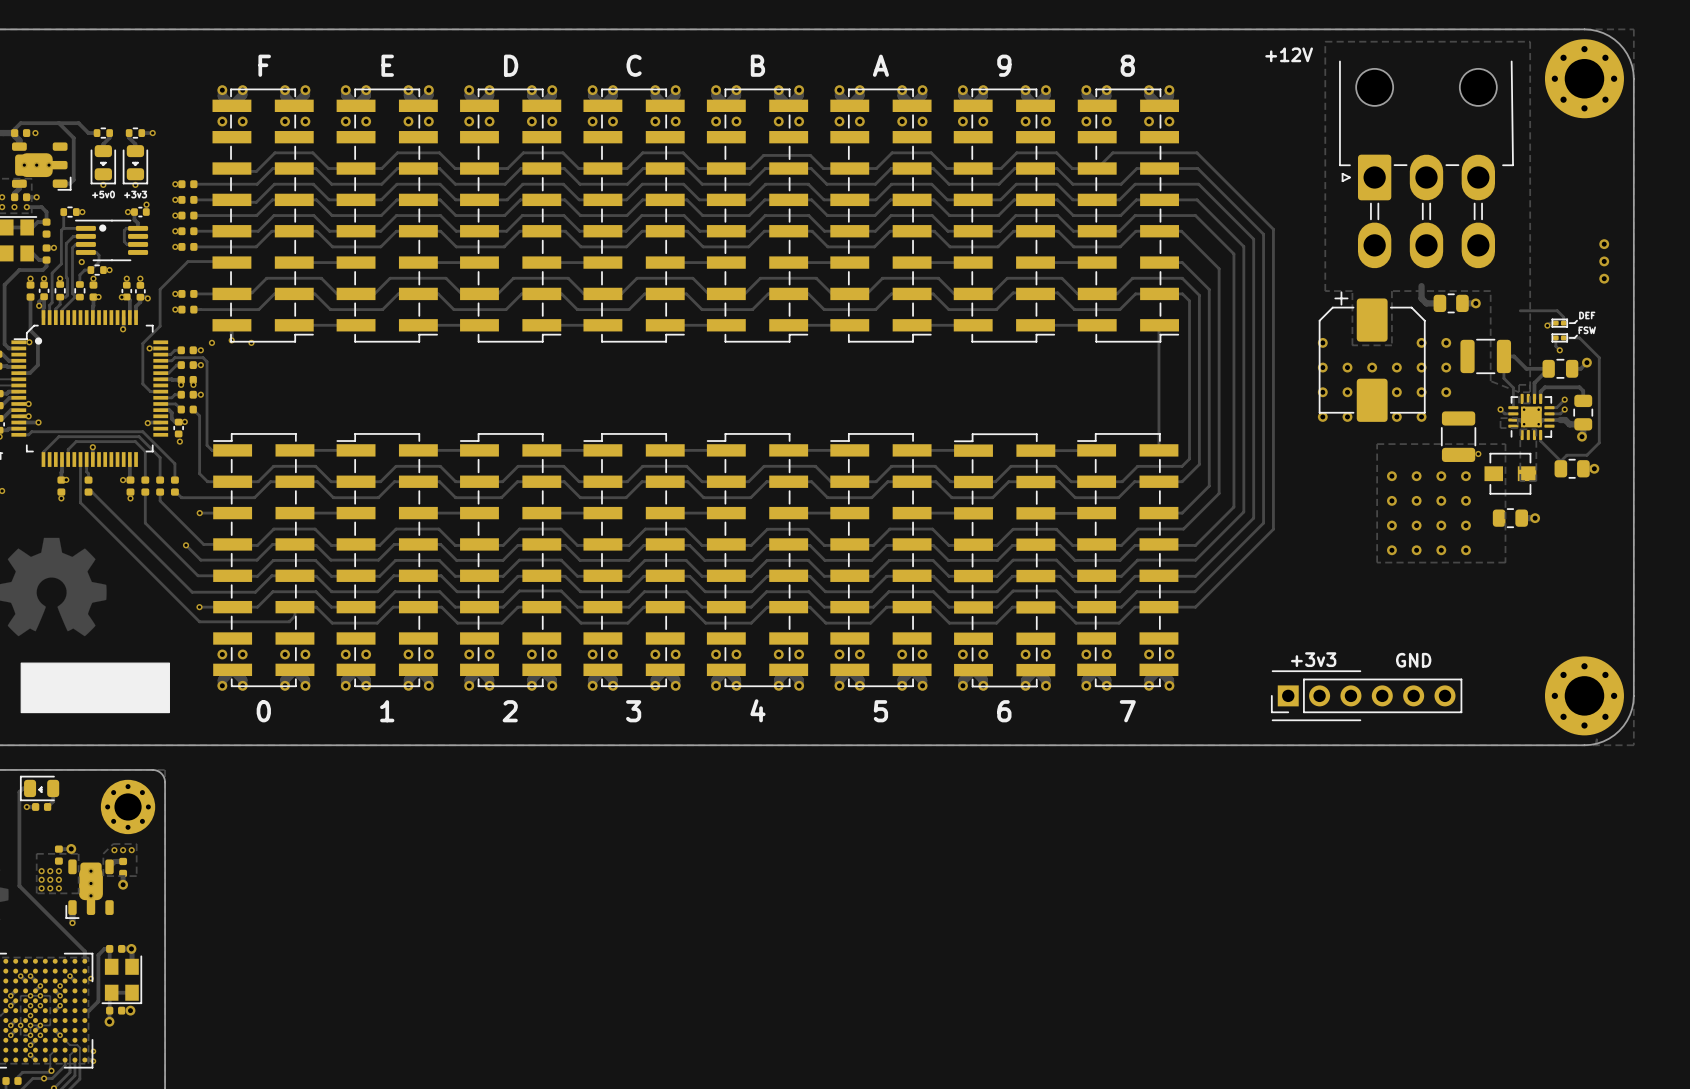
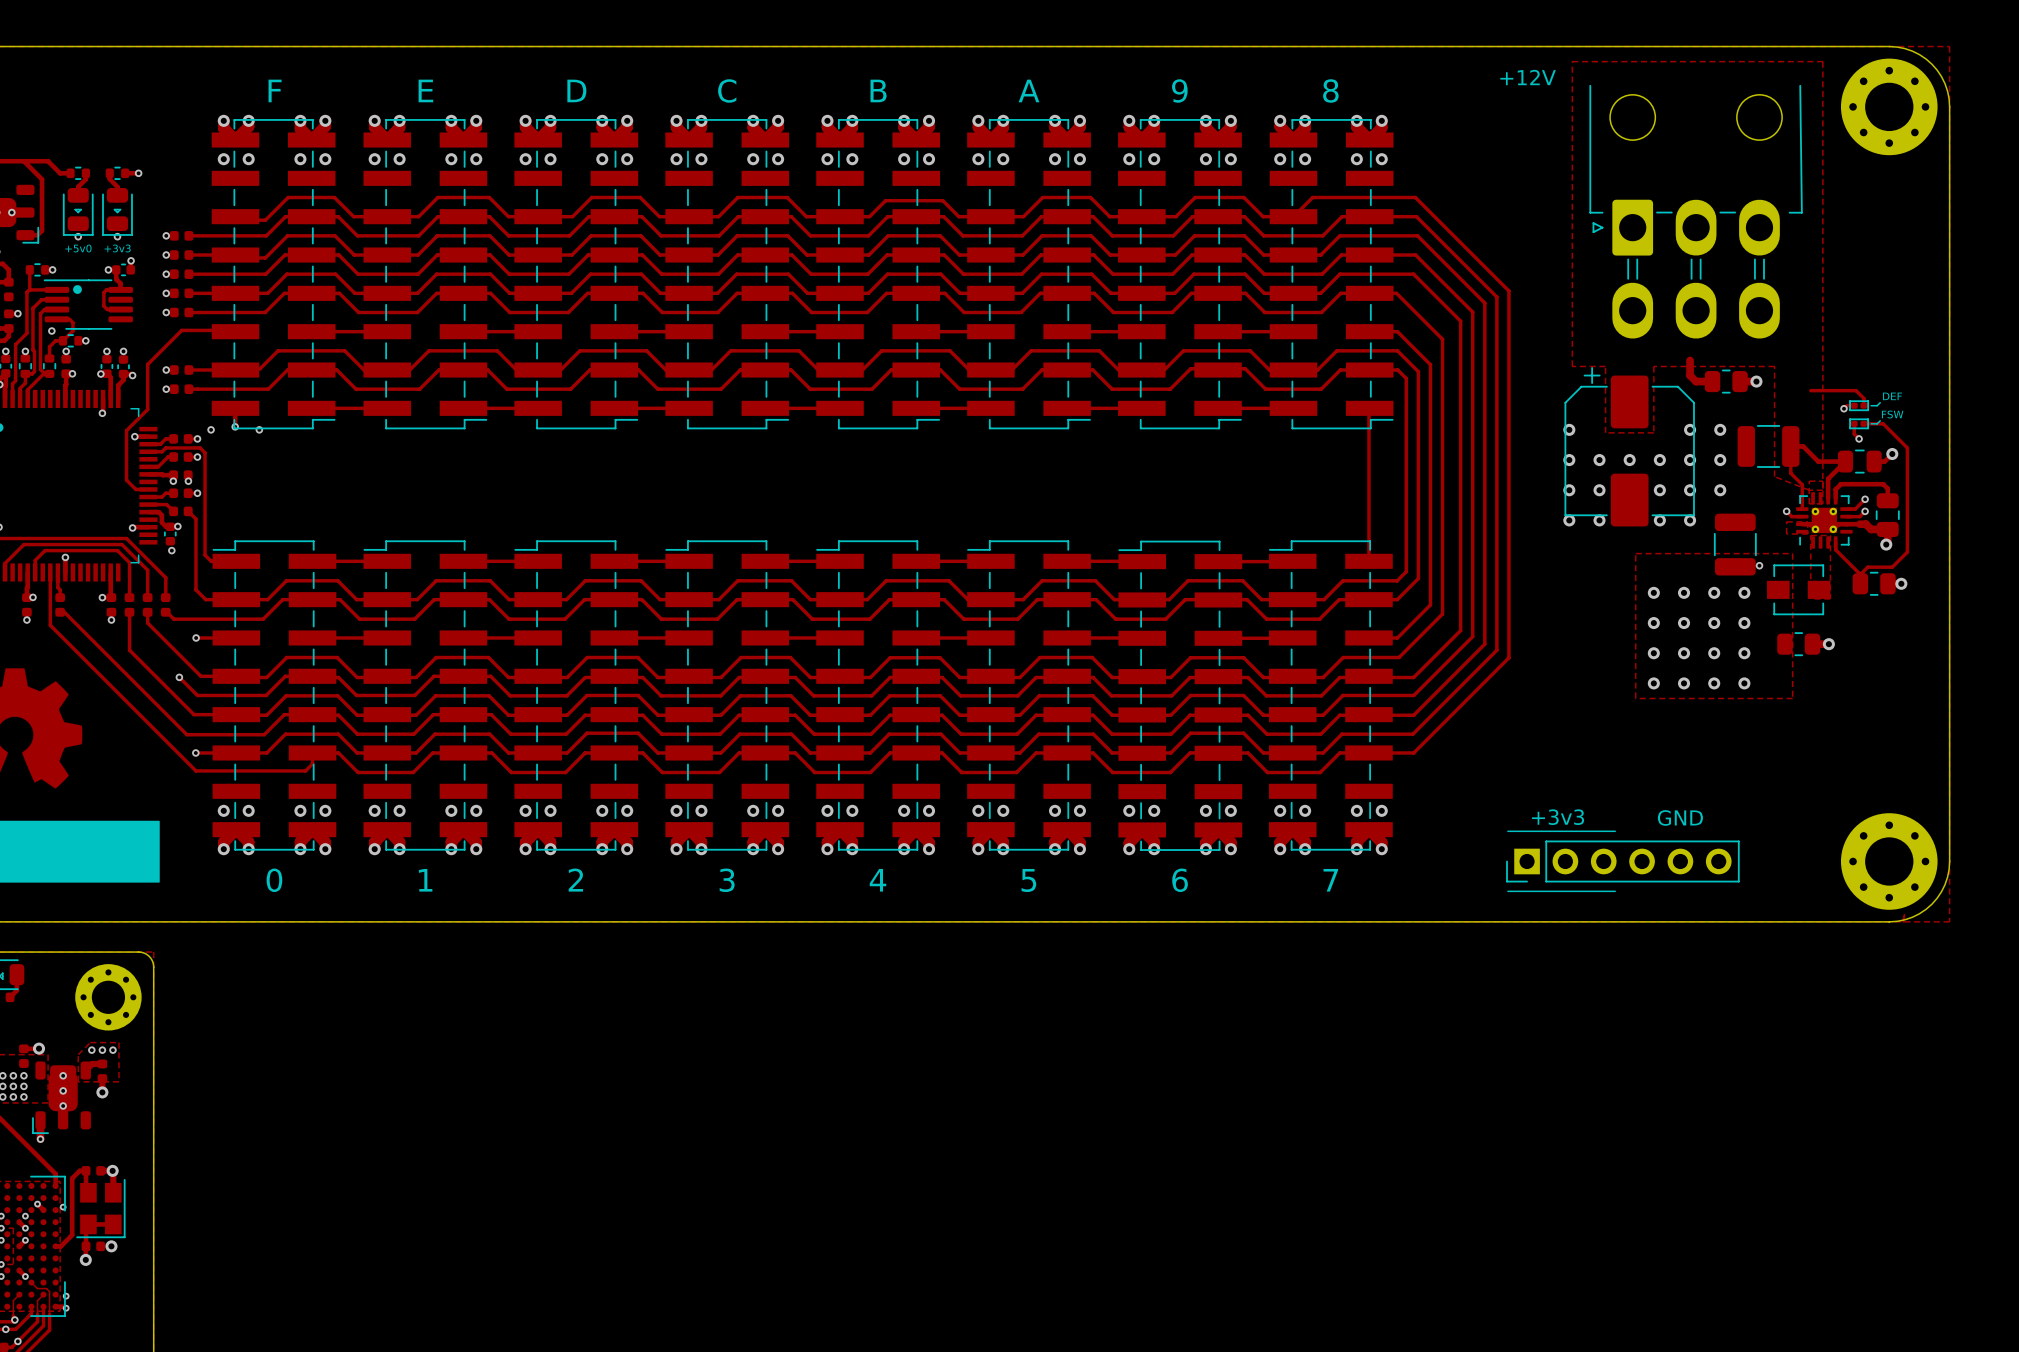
via: (1604, 244) -> none
via: (1604, 261) -> none
via: (1604, 278) -> none

